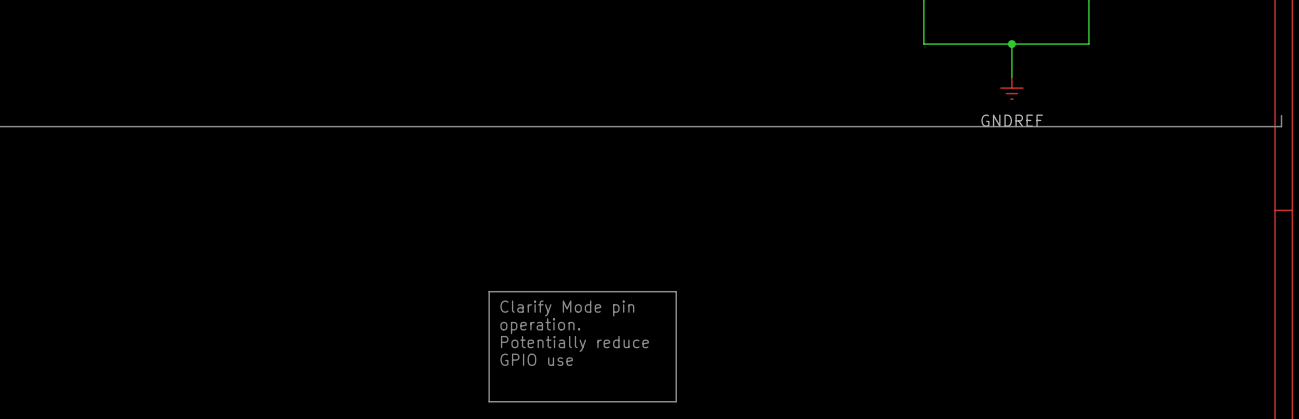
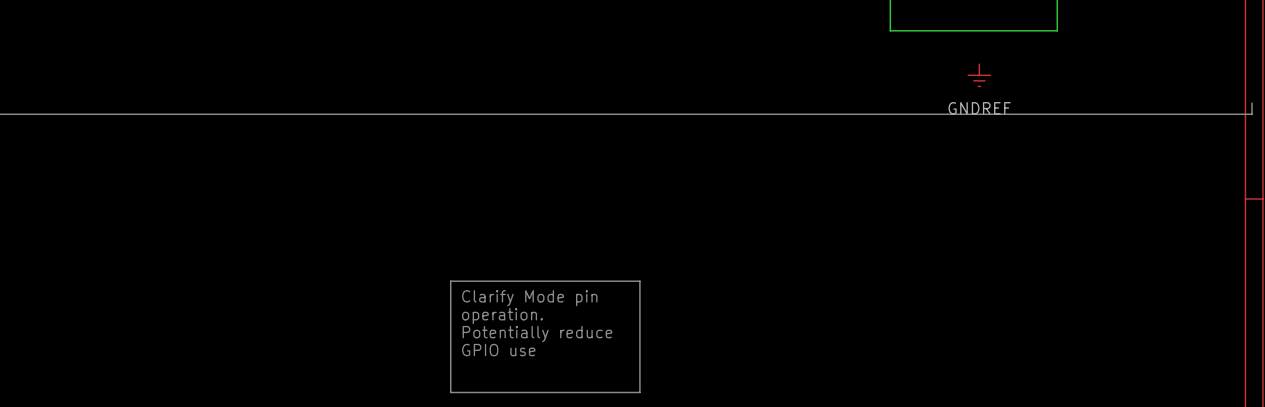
wire: (1011, 44) (1011, 77) -> none
junction: (1011, 44) -> none

